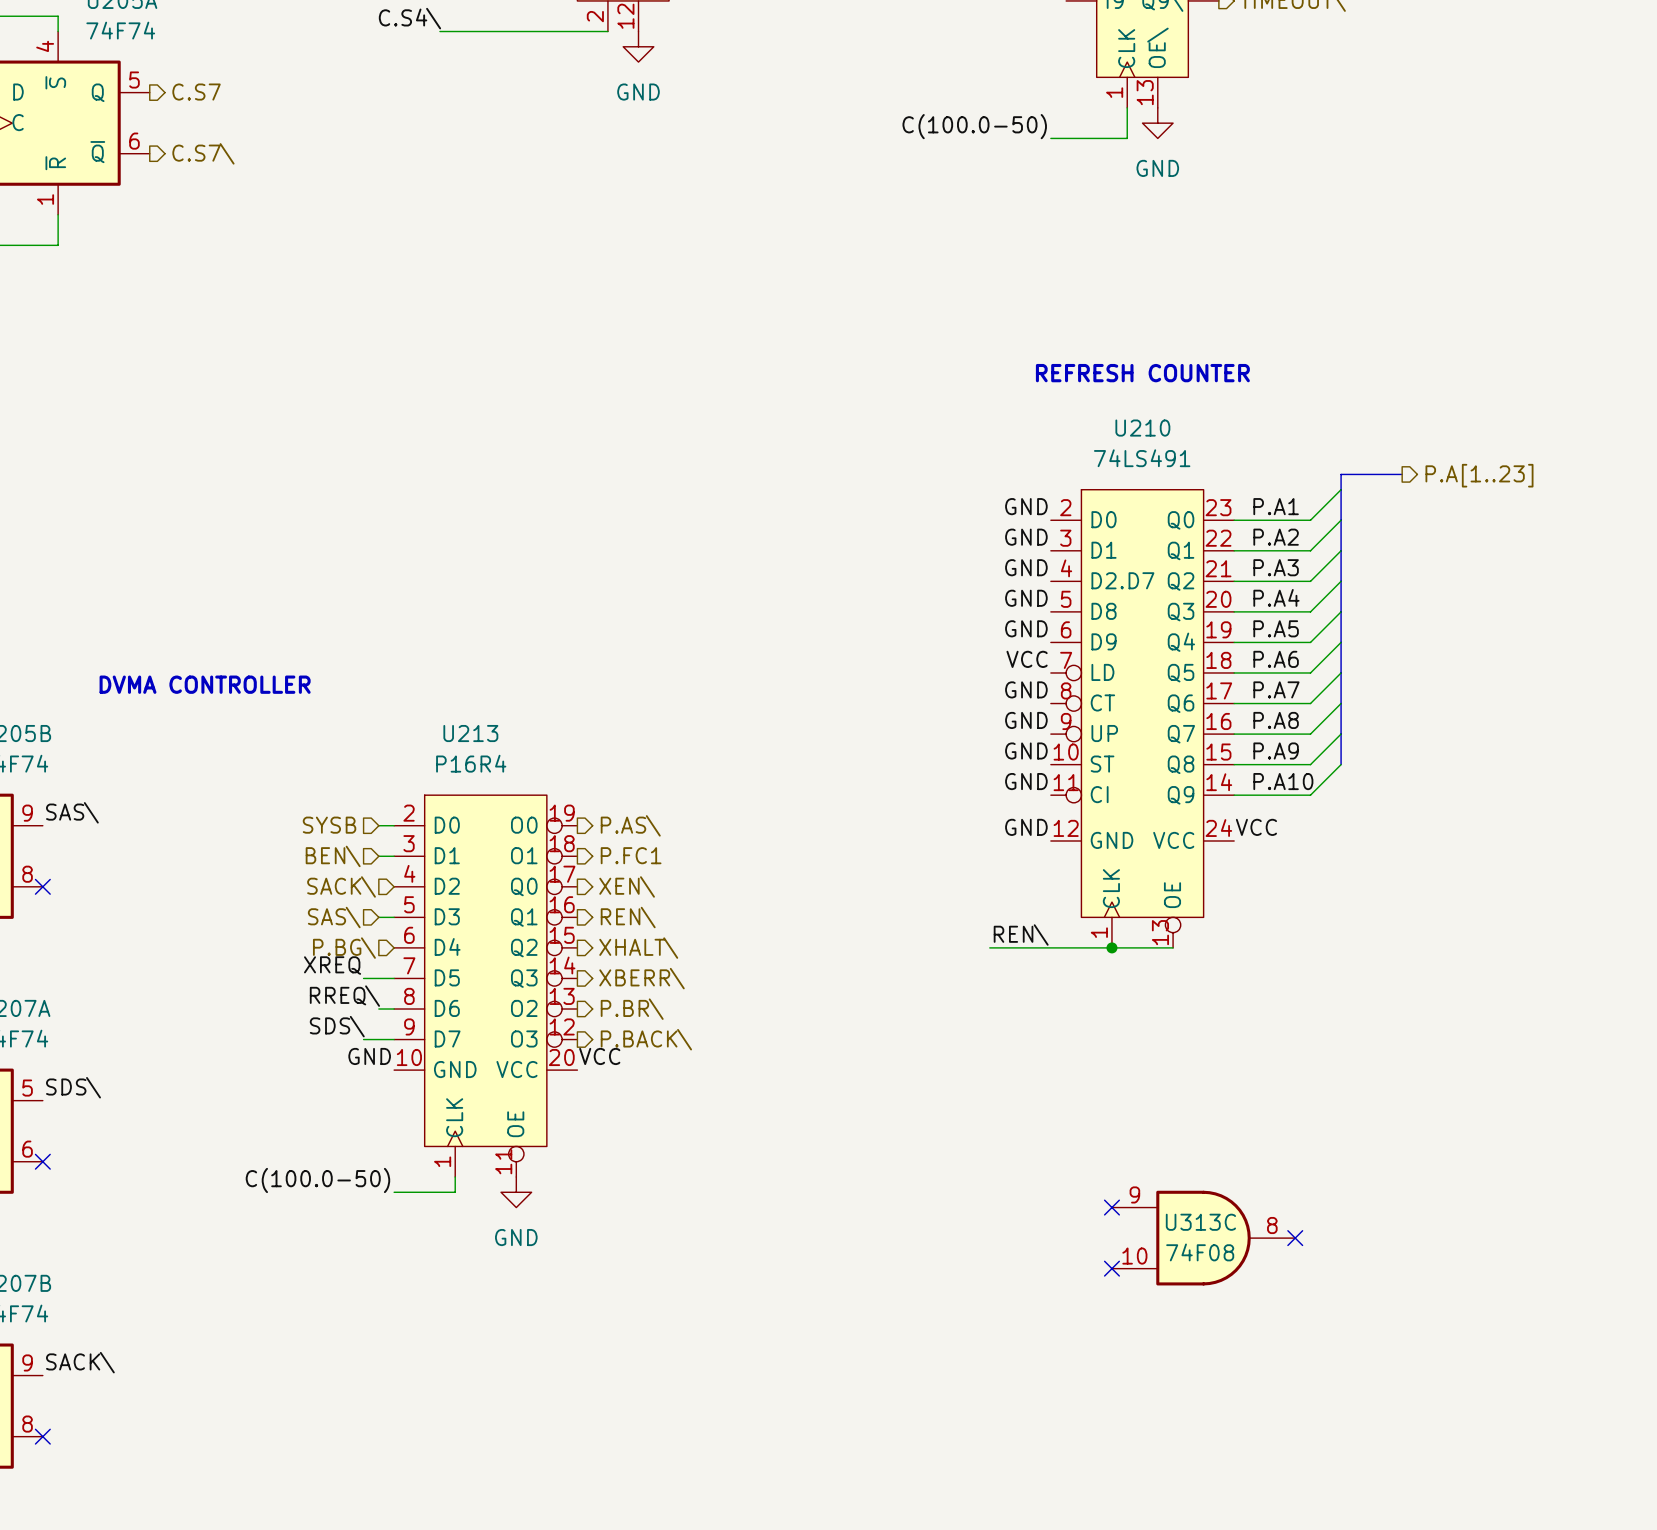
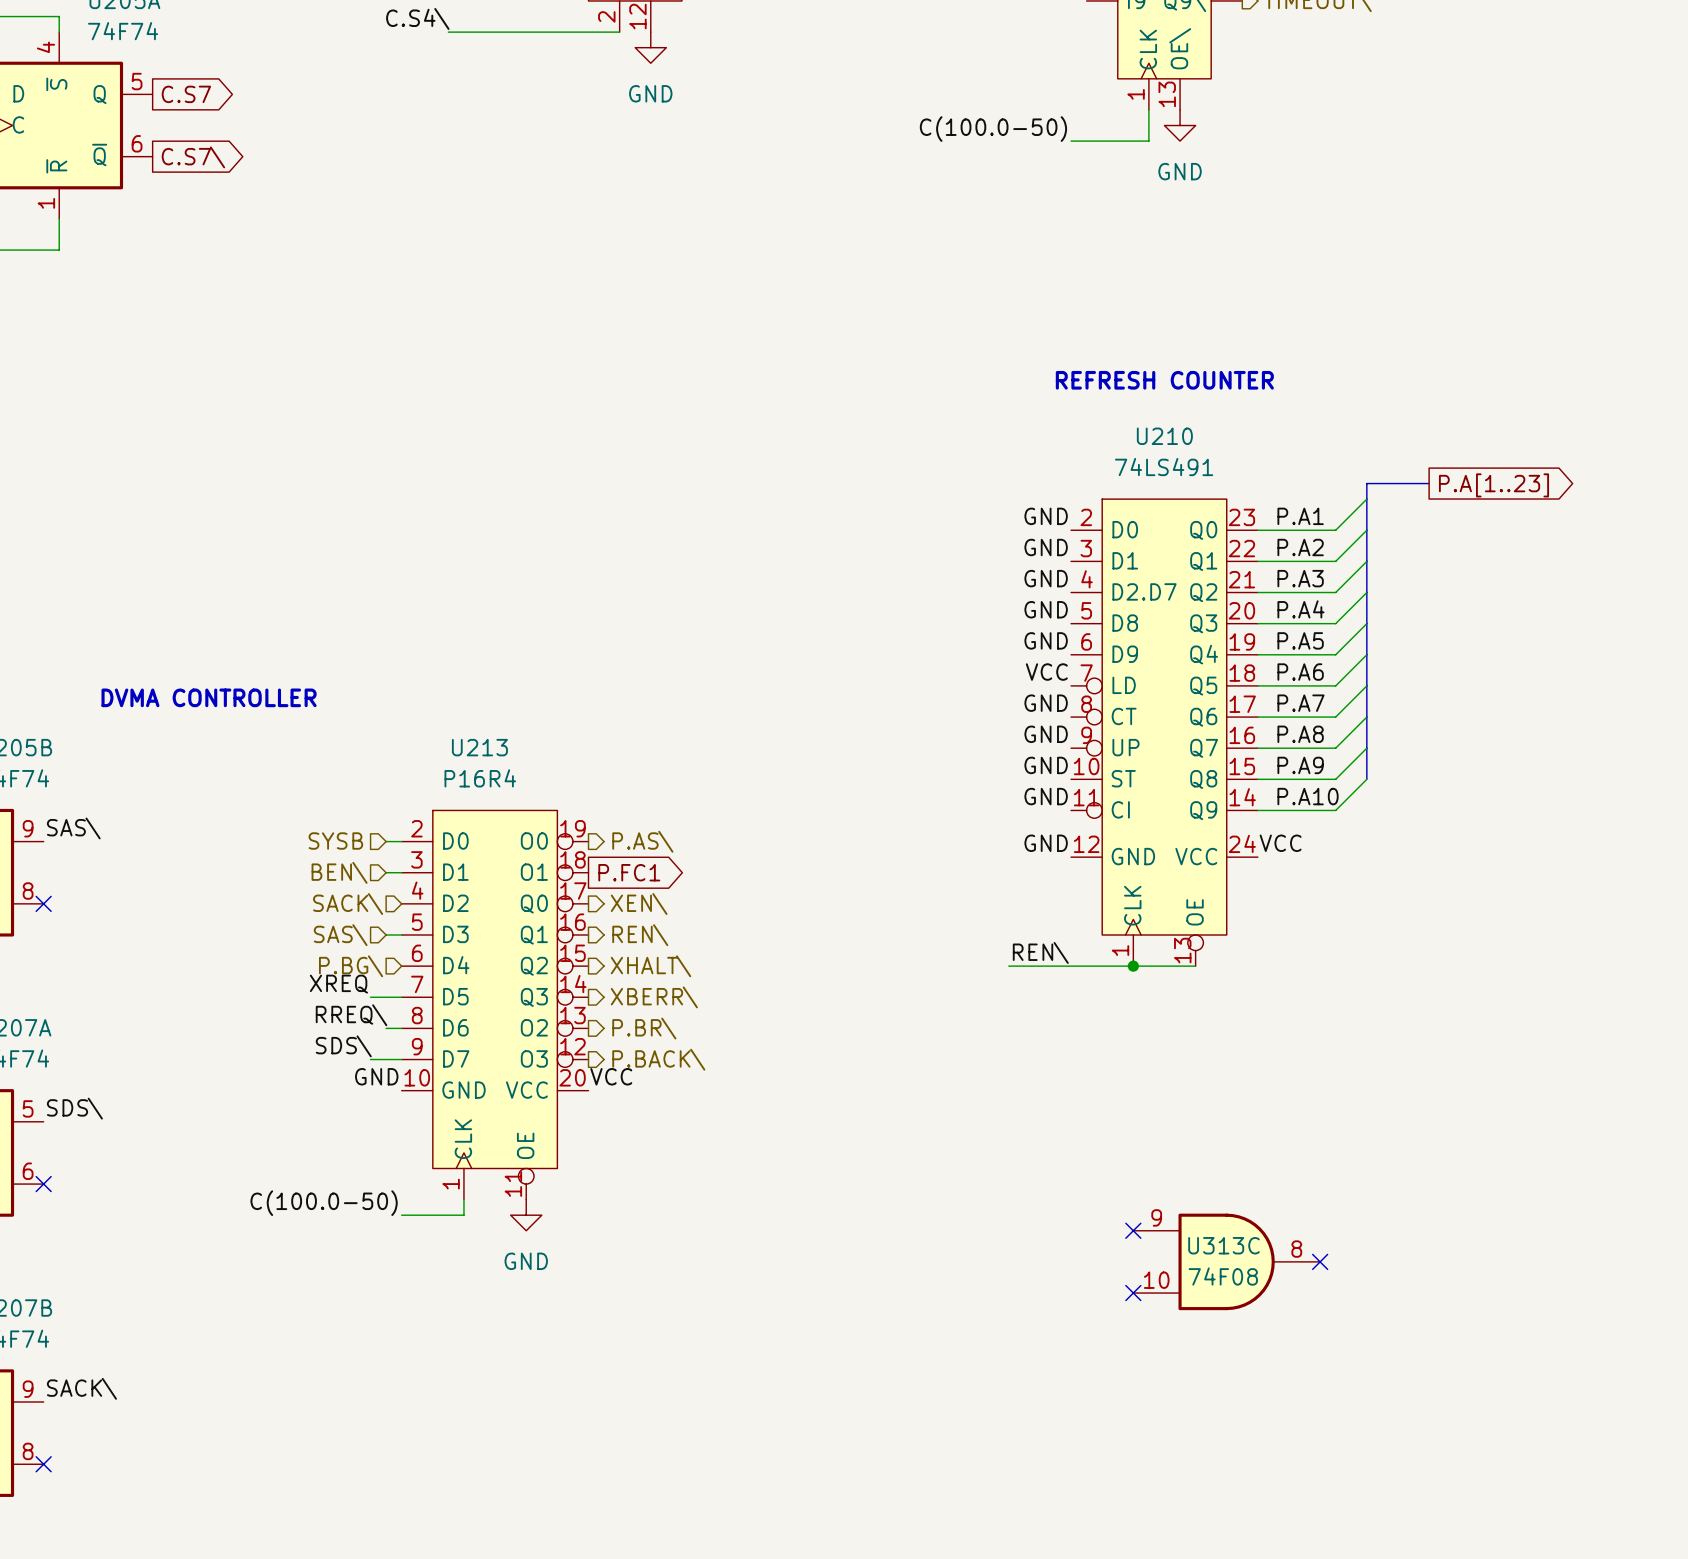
global label: none -> C.S7 (186, 94)
hierarchical label: C.S7 (196, 92) -> none
hierarchical label: C.S7\ (203, 153) -> none
global label: none -> C.S7\ (193, 157)
hierarchical label: P.A[1..23] (1479, 475) -> none
global label: none -> P.A[1..23] (1493, 485)
hierarchical label: P.FC1 (631, 855) -> none
global label: none -> P.FC1 (629, 872)

